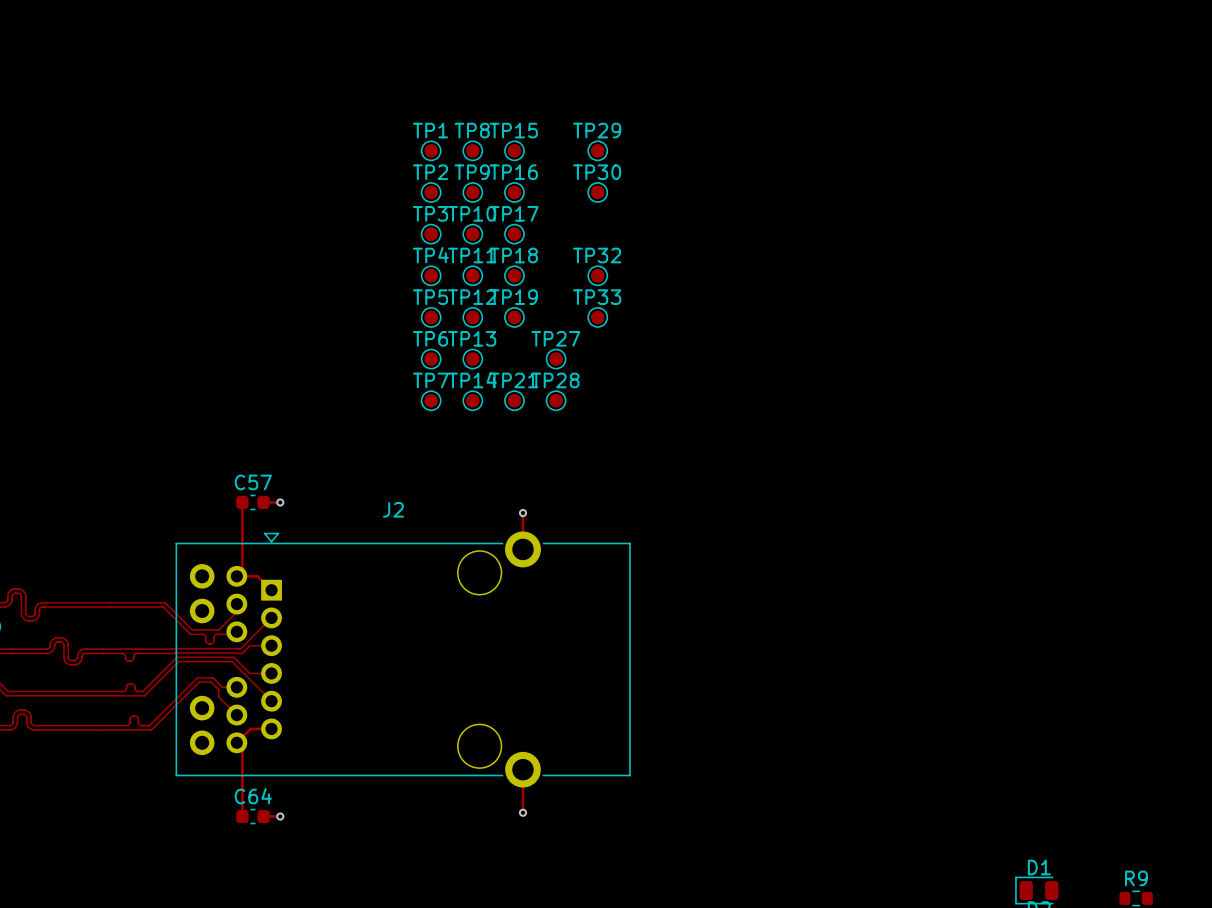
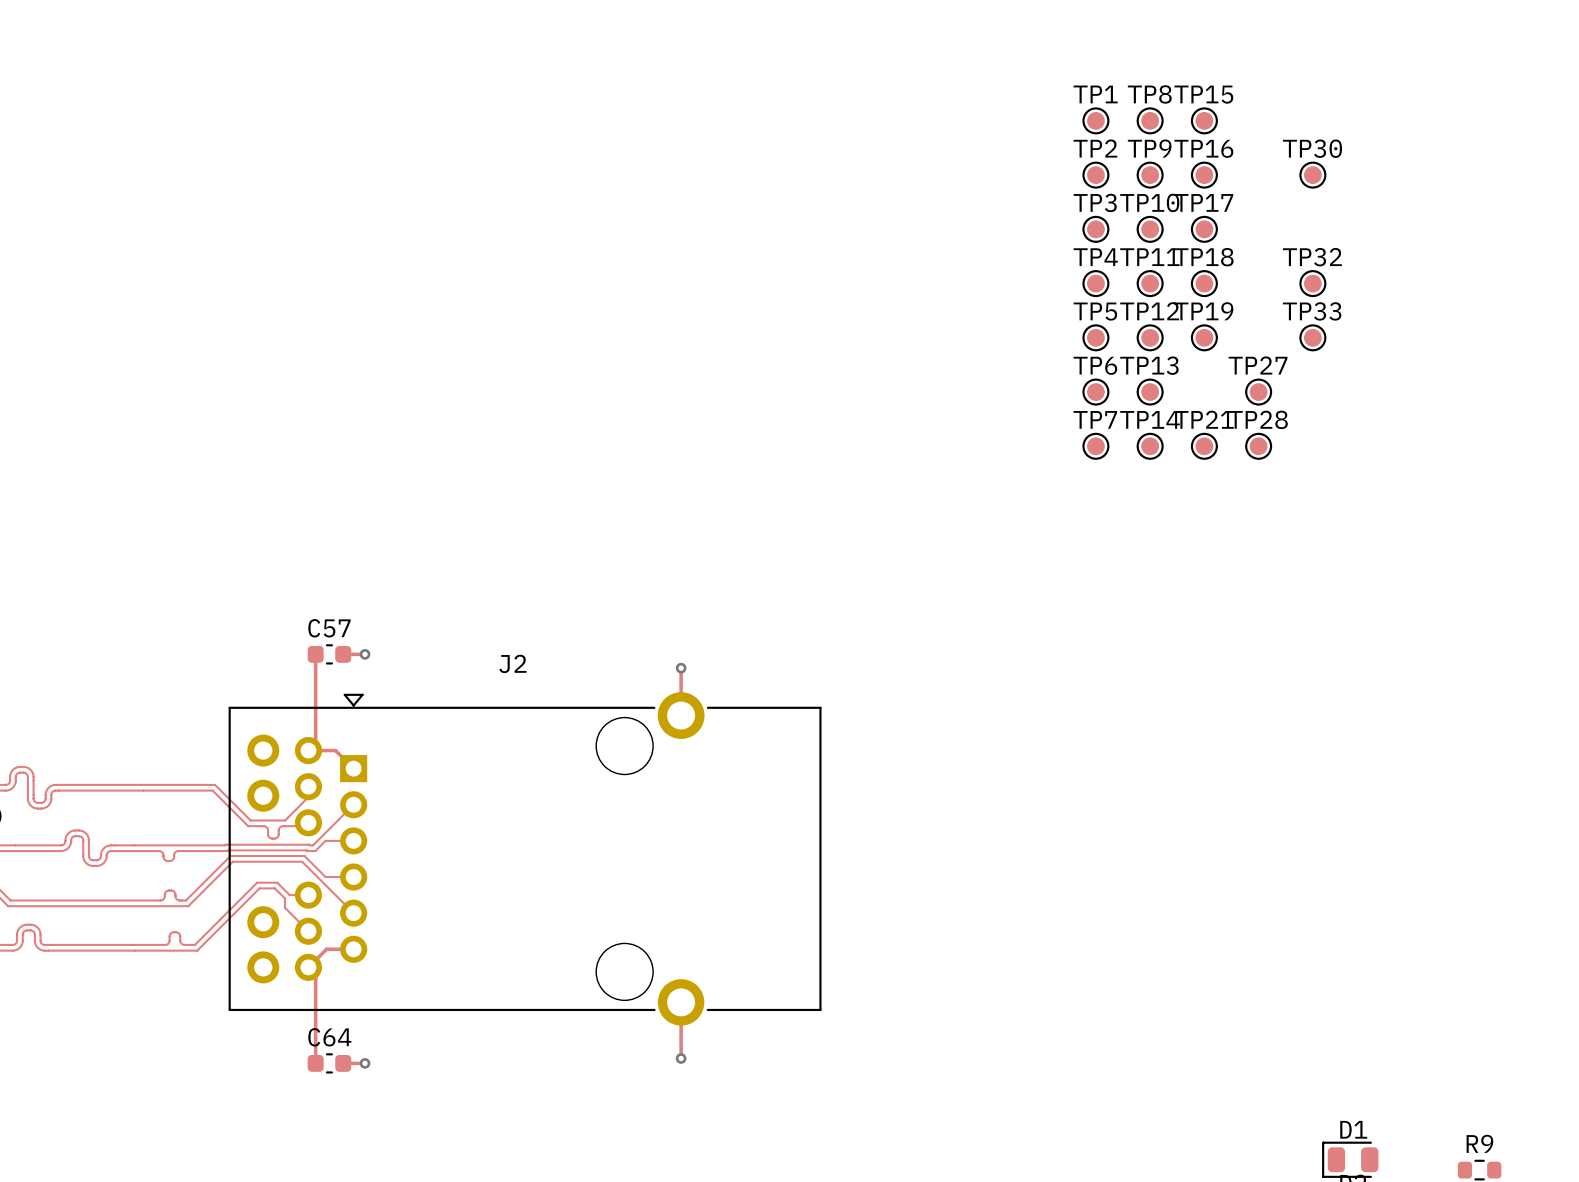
TP1 position: (431, 150) -> (1095, 120)
TP8 position: (472, 150) -> (1150, 120)
TP15 position: (514, 150) -> (1204, 120)
TP29: (597, 150) -> none
TP2 position: (431, 192) -> (1095, 175)
TP9 position: (472, 192) -> (1150, 175)
TP16 position: (514, 192) -> (1204, 175)
TP30 position: (597, 192) -> (1312, 175)
TP3 position: (431, 234) -> (1095, 229)
TP10 position: (472, 234) -> (1150, 229)
TP17 position: (514, 234) -> (1204, 229)
TP4 position: (431, 275) -> (1095, 283)
TP11 position: (472, 275) -> (1150, 283)
TP18 position: (514, 275) -> (1204, 283)
TP32 position: (597, 275) -> (1312, 283)
TP5 position: (431, 317) -> (1095, 337)
TP12 position: (472, 317) -> (1150, 337)
TP19 position: (514, 317) -> (1204, 337)
TP33 position: (597, 317) -> (1312, 337)
TP6 position: (431, 359) -> (1095, 392)
TP13 position: (472, 359) -> (1150, 392)
TP27 position: (556, 359) -> (1258, 392)
TP7 position: (431, 400) -> (1095, 446)
TP14 position: (472, 400) -> (1150, 446)
TP21 position: (514, 400) -> (1204, 446)
TP28 position: (556, 400) -> (1258, 446)

